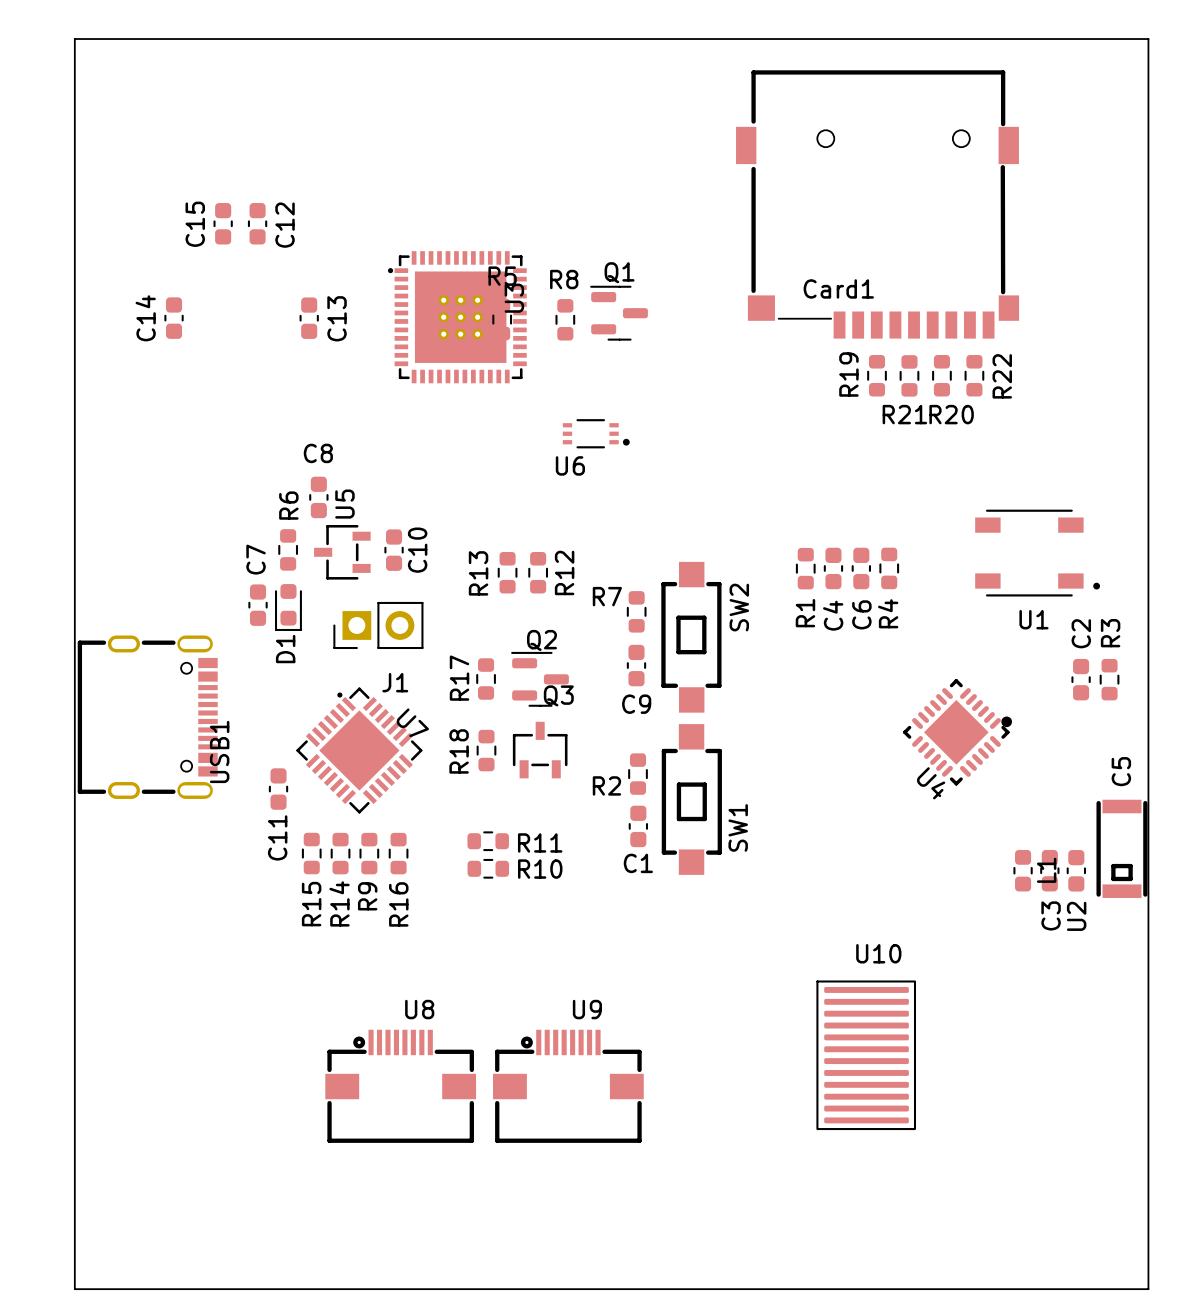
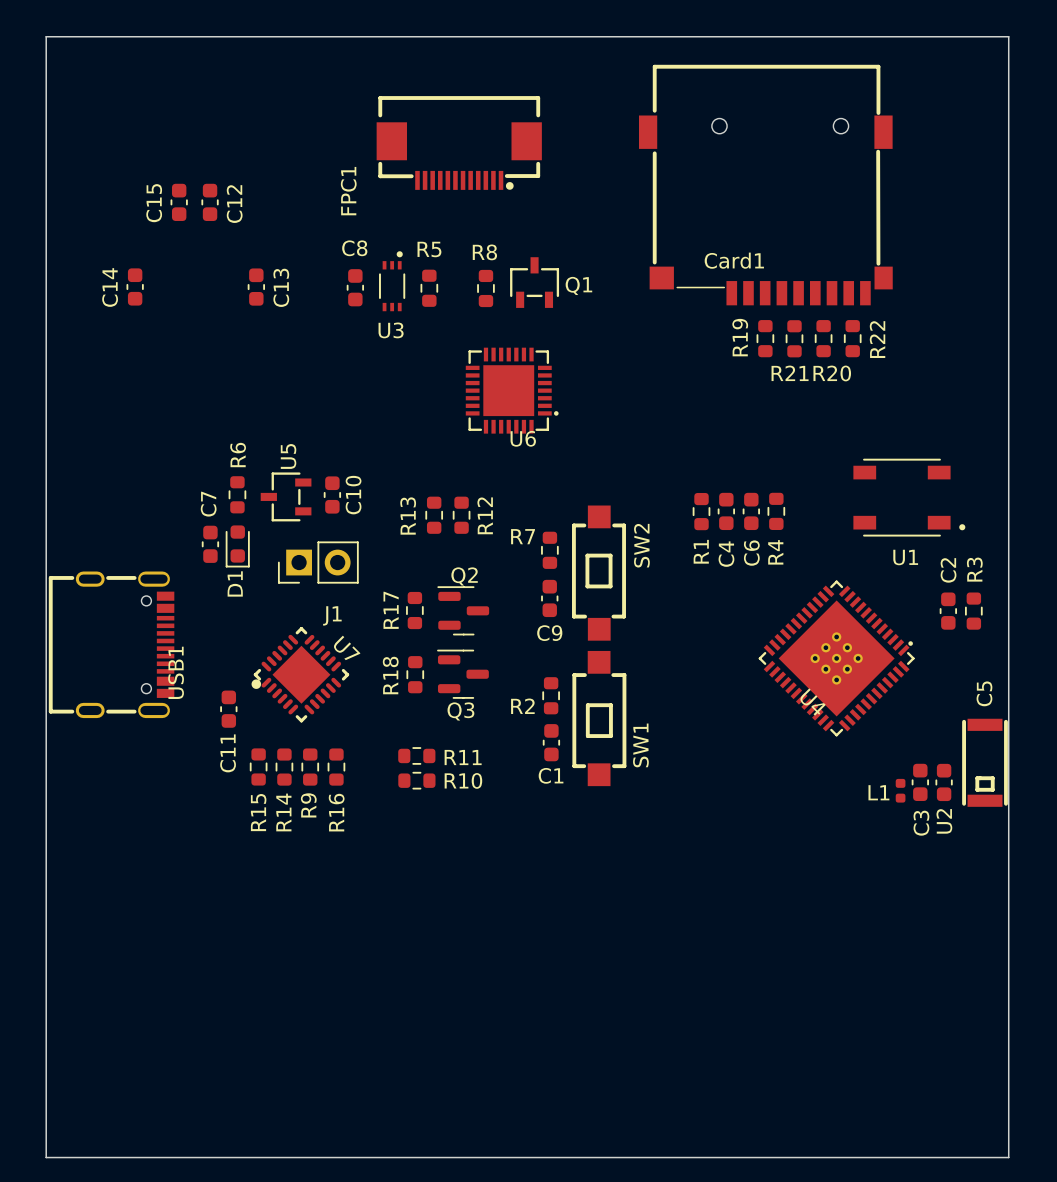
FPC1: none -> (459, 142)
U3 footprint: [388, 251, 527, 384] -> [379, 251, 406, 312]
Q1 name position: Q1 (619, 272) -> Q1 (578, 285)
Q1 footprint: [590, 285, 648, 341] -> [510, 257, 560, 308]
U3 name position: U3 (514, 298) -> U3 (391, 330)
U6 footprint: [562, 419, 630, 449] -> [465, 347, 559, 434]
U6 name position: U6 (570, 465) -> U6 (523, 438)
C8 position: (318, 497) -> (355, 287)
U4 footprint: [903, 679, 1013, 786] -> [758, 580, 915, 737]
U7 footprint: [296, 687, 423, 814] -> [251, 627, 350, 723]
Q3 name position: Q3 (558, 695) -> Q3 (460, 711)
Q3 footprint: [512, 721, 568, 779] -> [437, 649, 489, 699]
L1 footprint: [1013, 849, 1033, 892] -> [895, 778, 906, 803]
L1 name position: L1 (1046, 870) -> L1 (878, 792)
U10: (866, 1055) -> none
U8: (400, 1086) -> none
U9: (568, 1086) -> none

